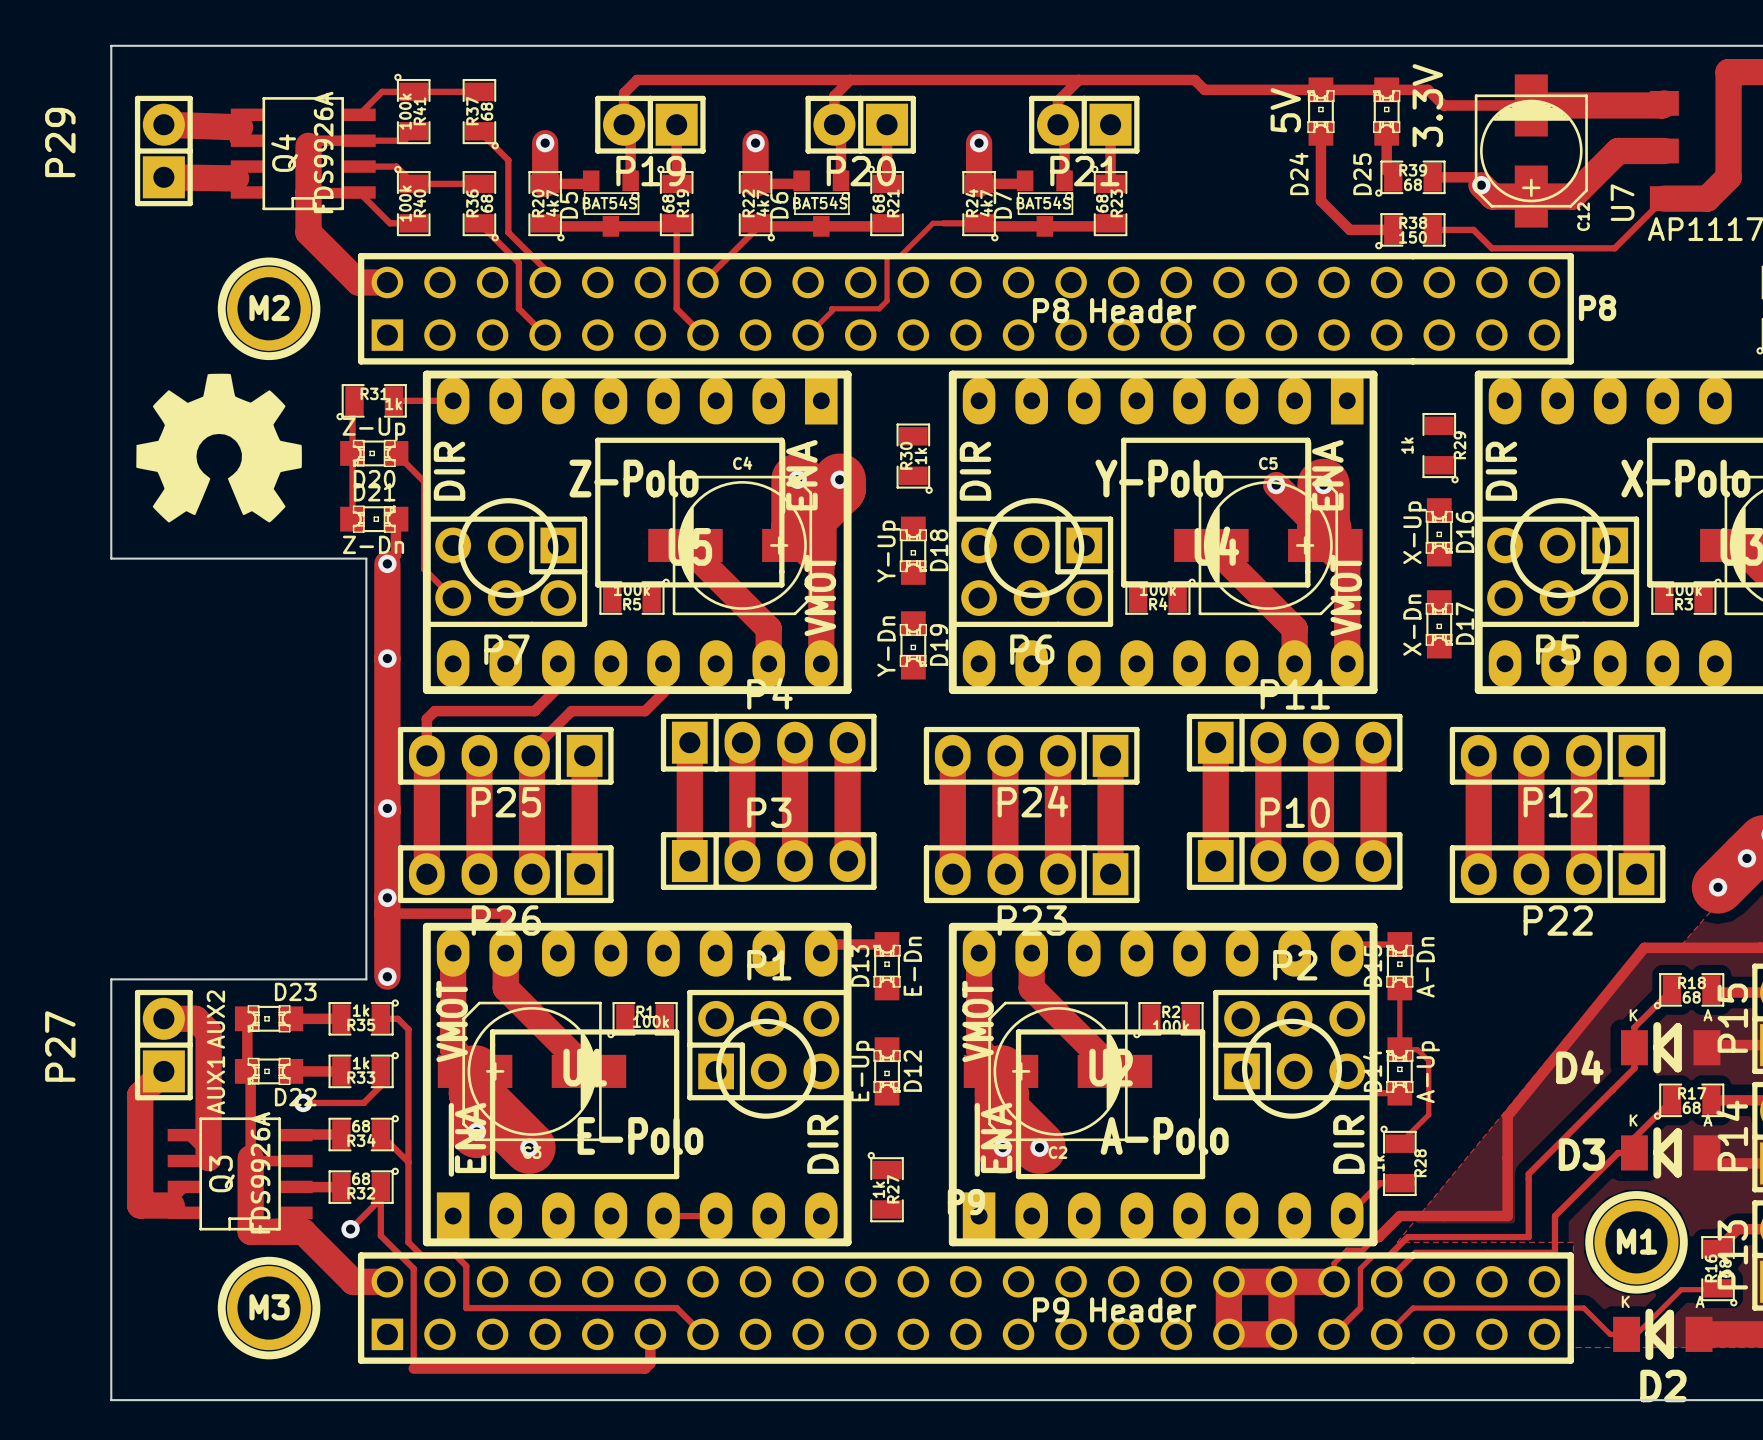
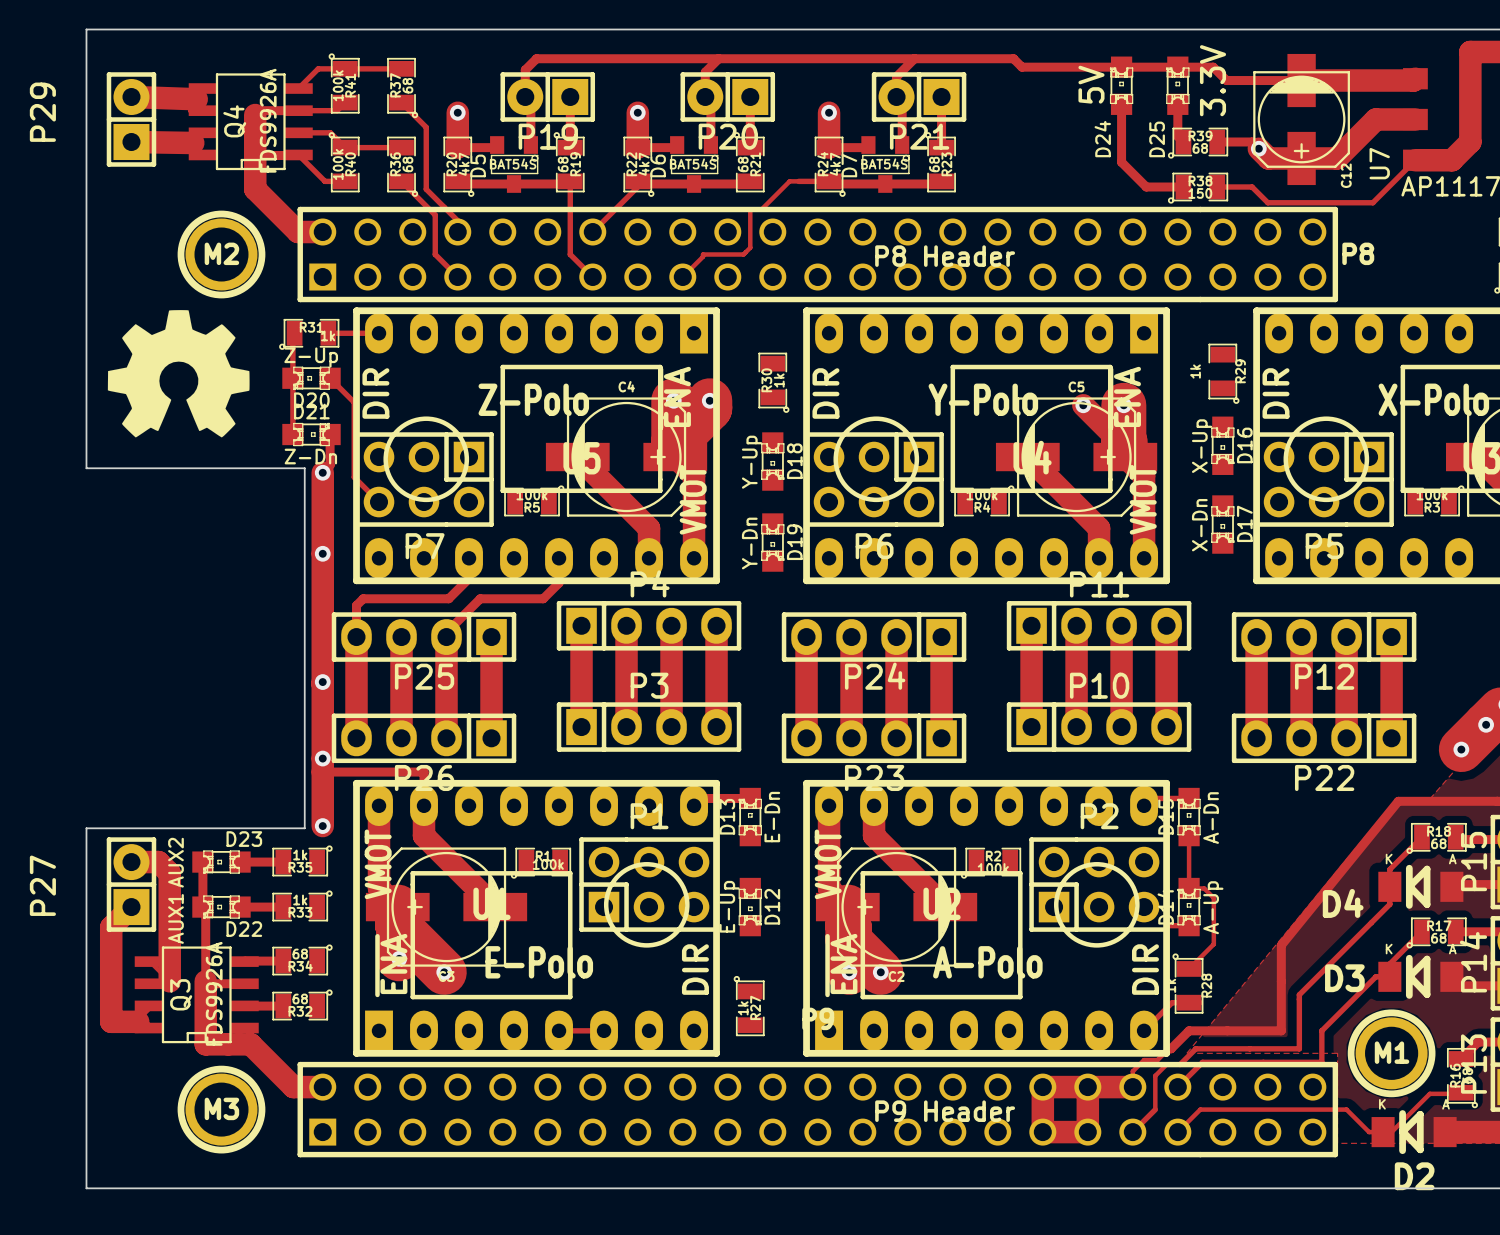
track: (380, 1018) (397, 1018) (408, 1029) (408, 1242) (421, 1255) (455, 1255) (466, 1266) (466, 1308) (676, 1308) (702, 1334) -> none
track: (380, 1071) (380, 1085) (363, 1102) (303, 1102) -> none
via: (303, 1102) -> none
track: (380, 1134) (408, 1162) -> none
track: (380, 1187) (380, 1235) (413, 1268) (413, 1368) (645, 1368) (650, 1363) (650, 1334) -> none
track: (380, 1198) (350, 1229) -> none
via: (350, 1229) -> none

